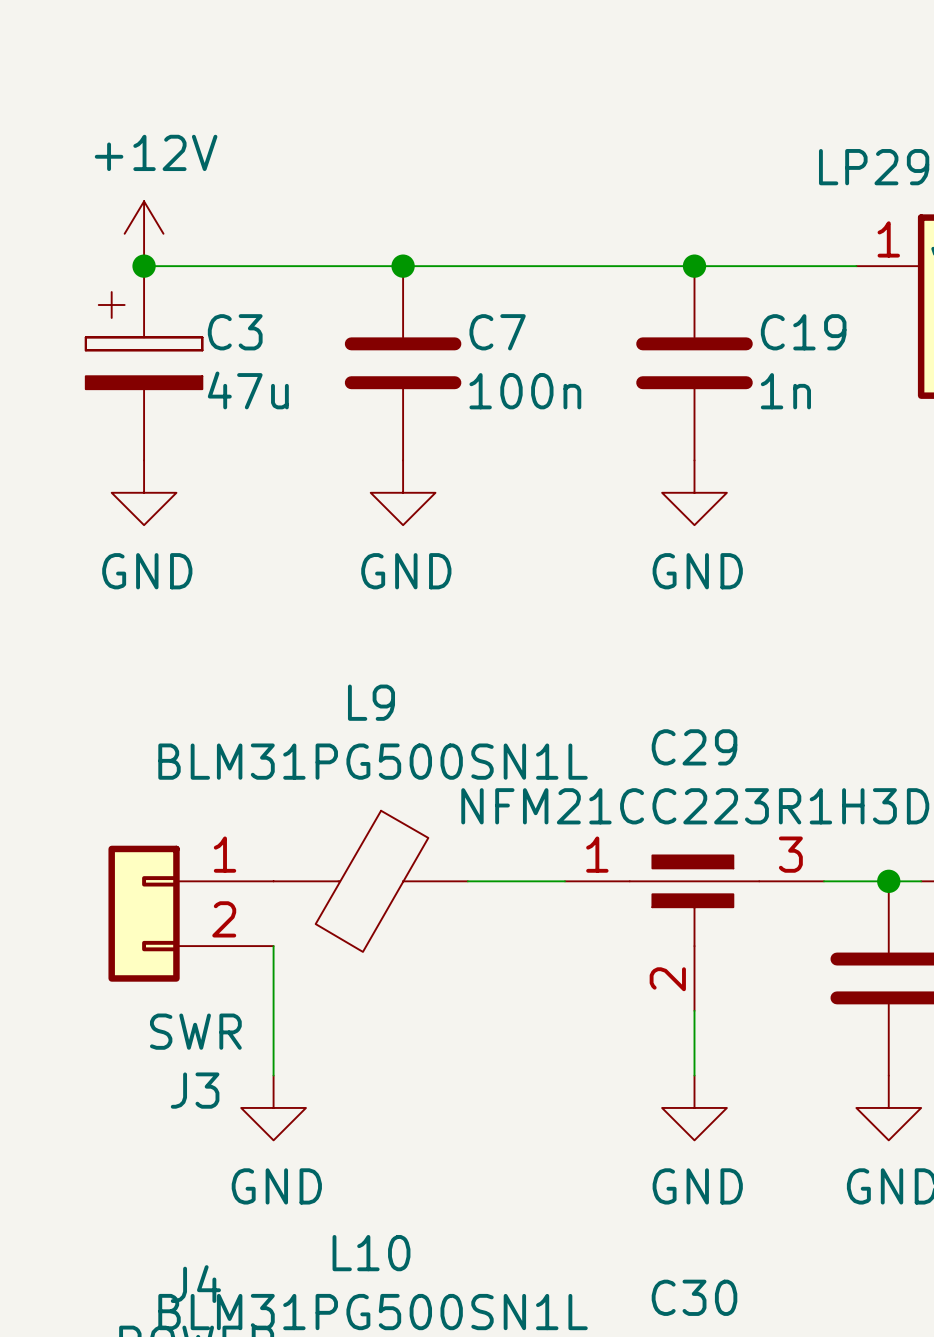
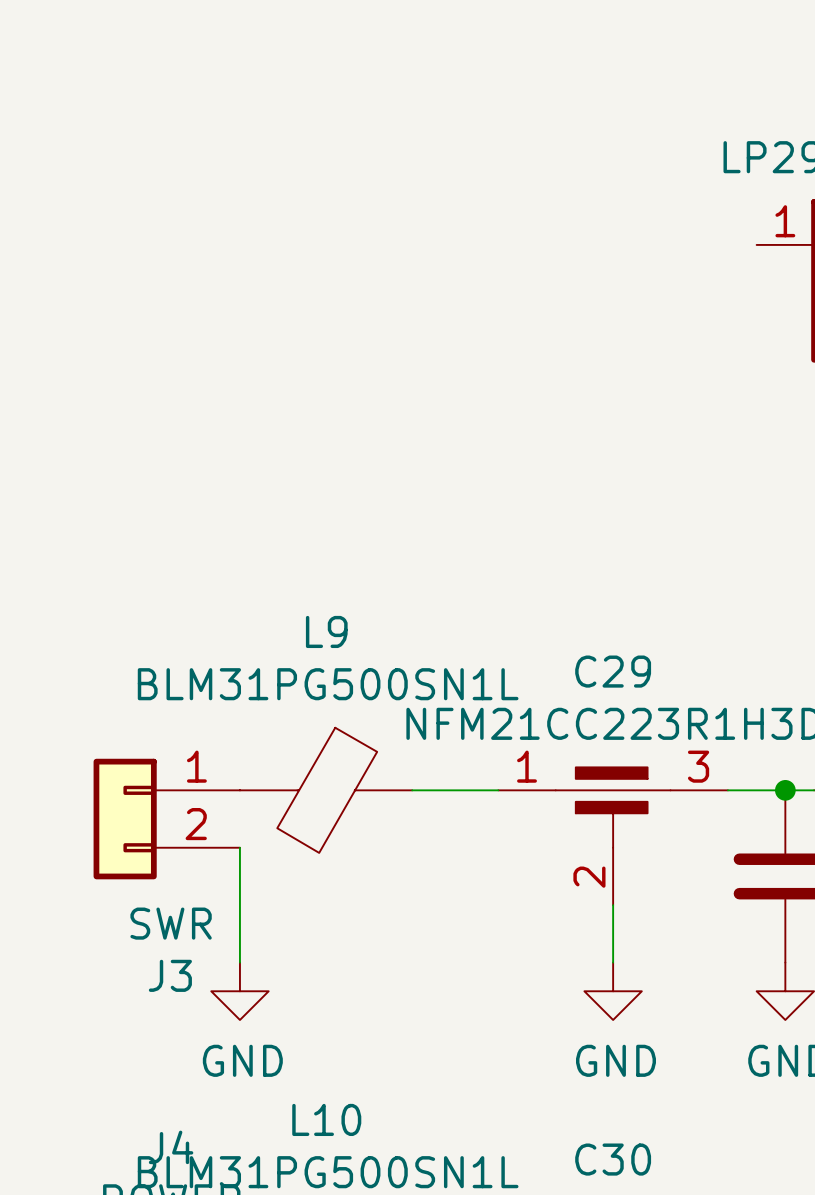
power symbol: +12V (144, 233) -> none
wire: (144, 266) (856, 266) -> none
junction: (144, 266) -> none
junction: (403, 266) -> none
junction: (694, 266) -> none
C3: 47u (144, 363) -> none
C7: 100n (403, 363) -> none
C19: 1n (694, 363) -> none
power symbol: GND (144, 492) -> none
power symbol: GND (403, 492) -> none
power symbol: GND (694, 492) -> none

